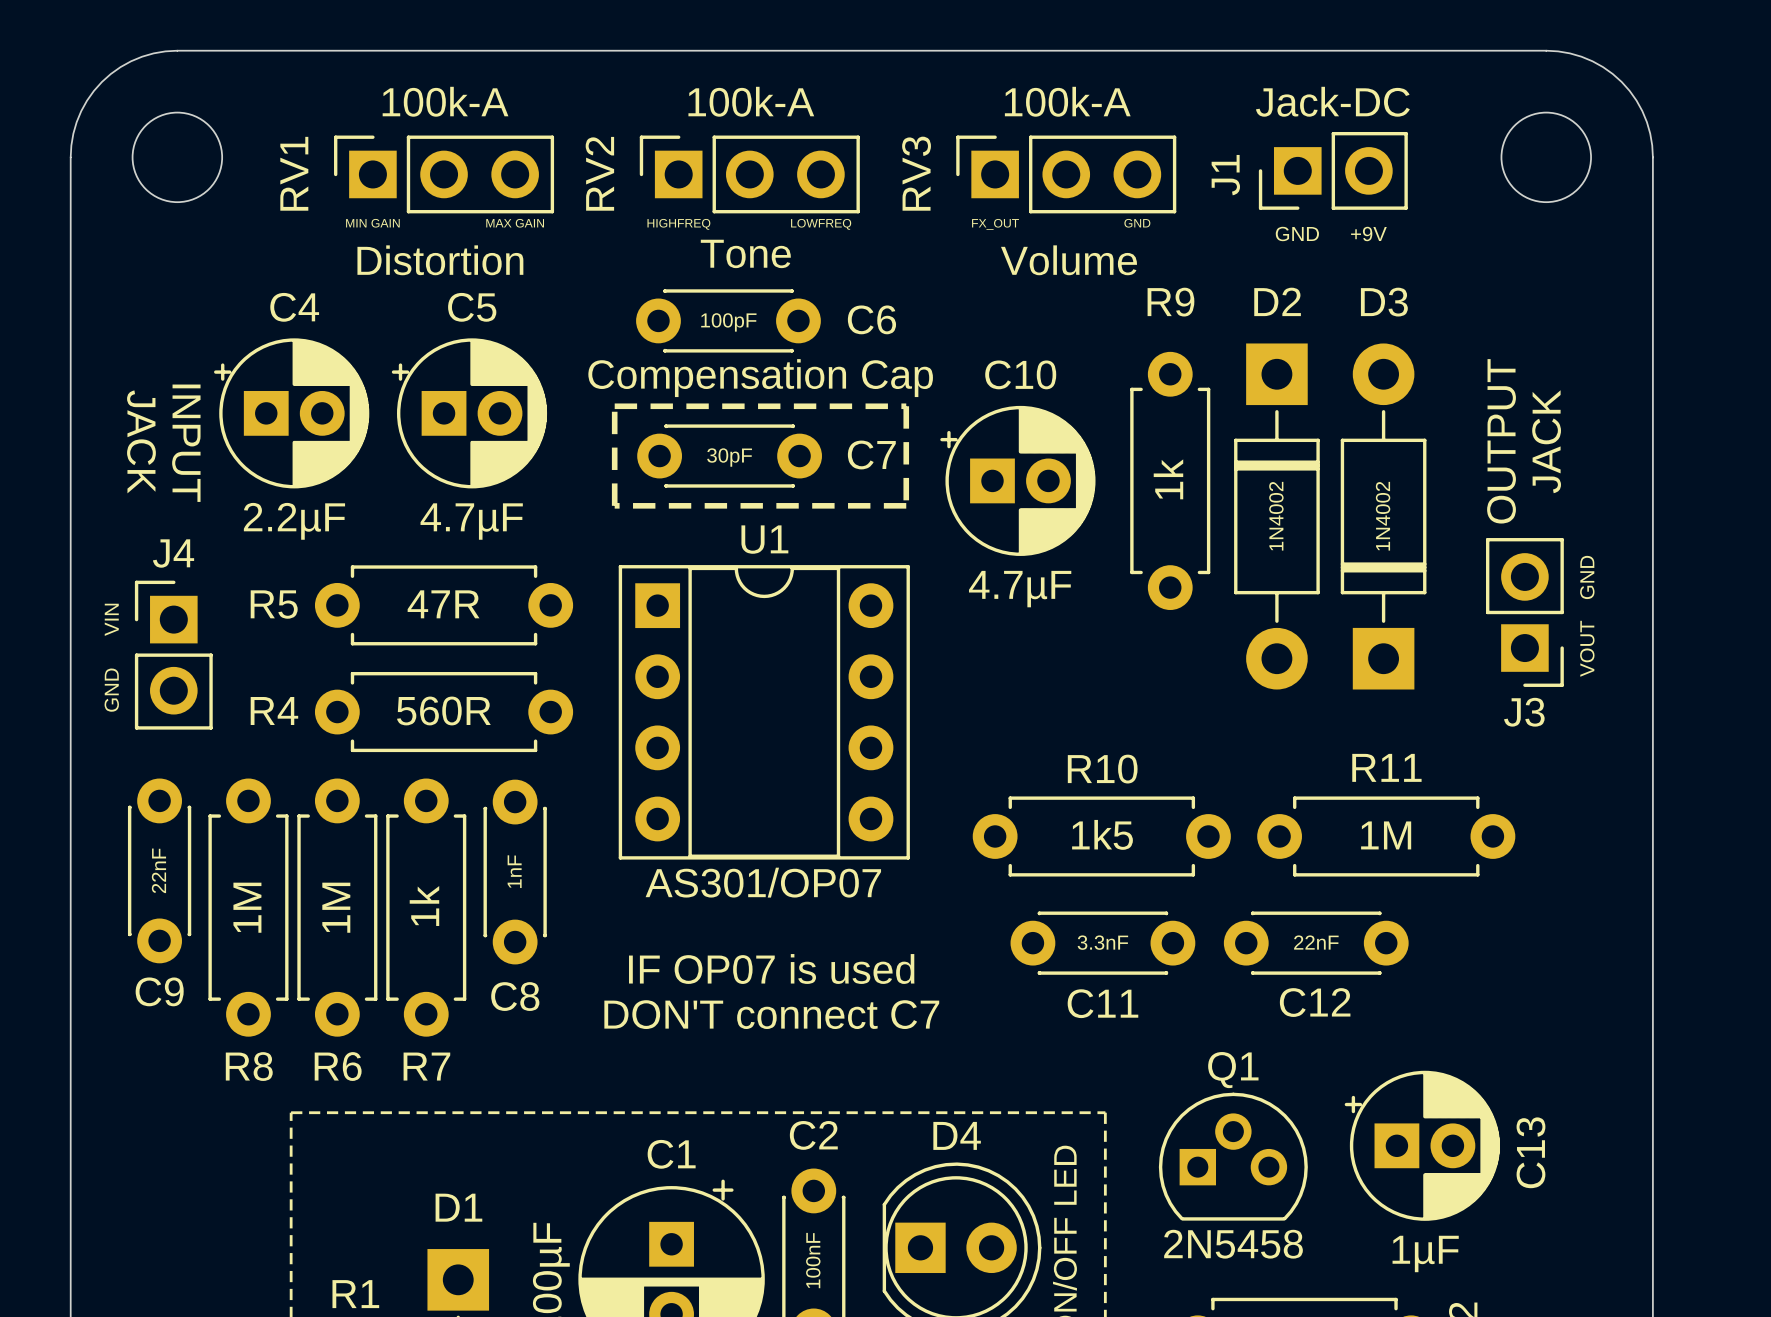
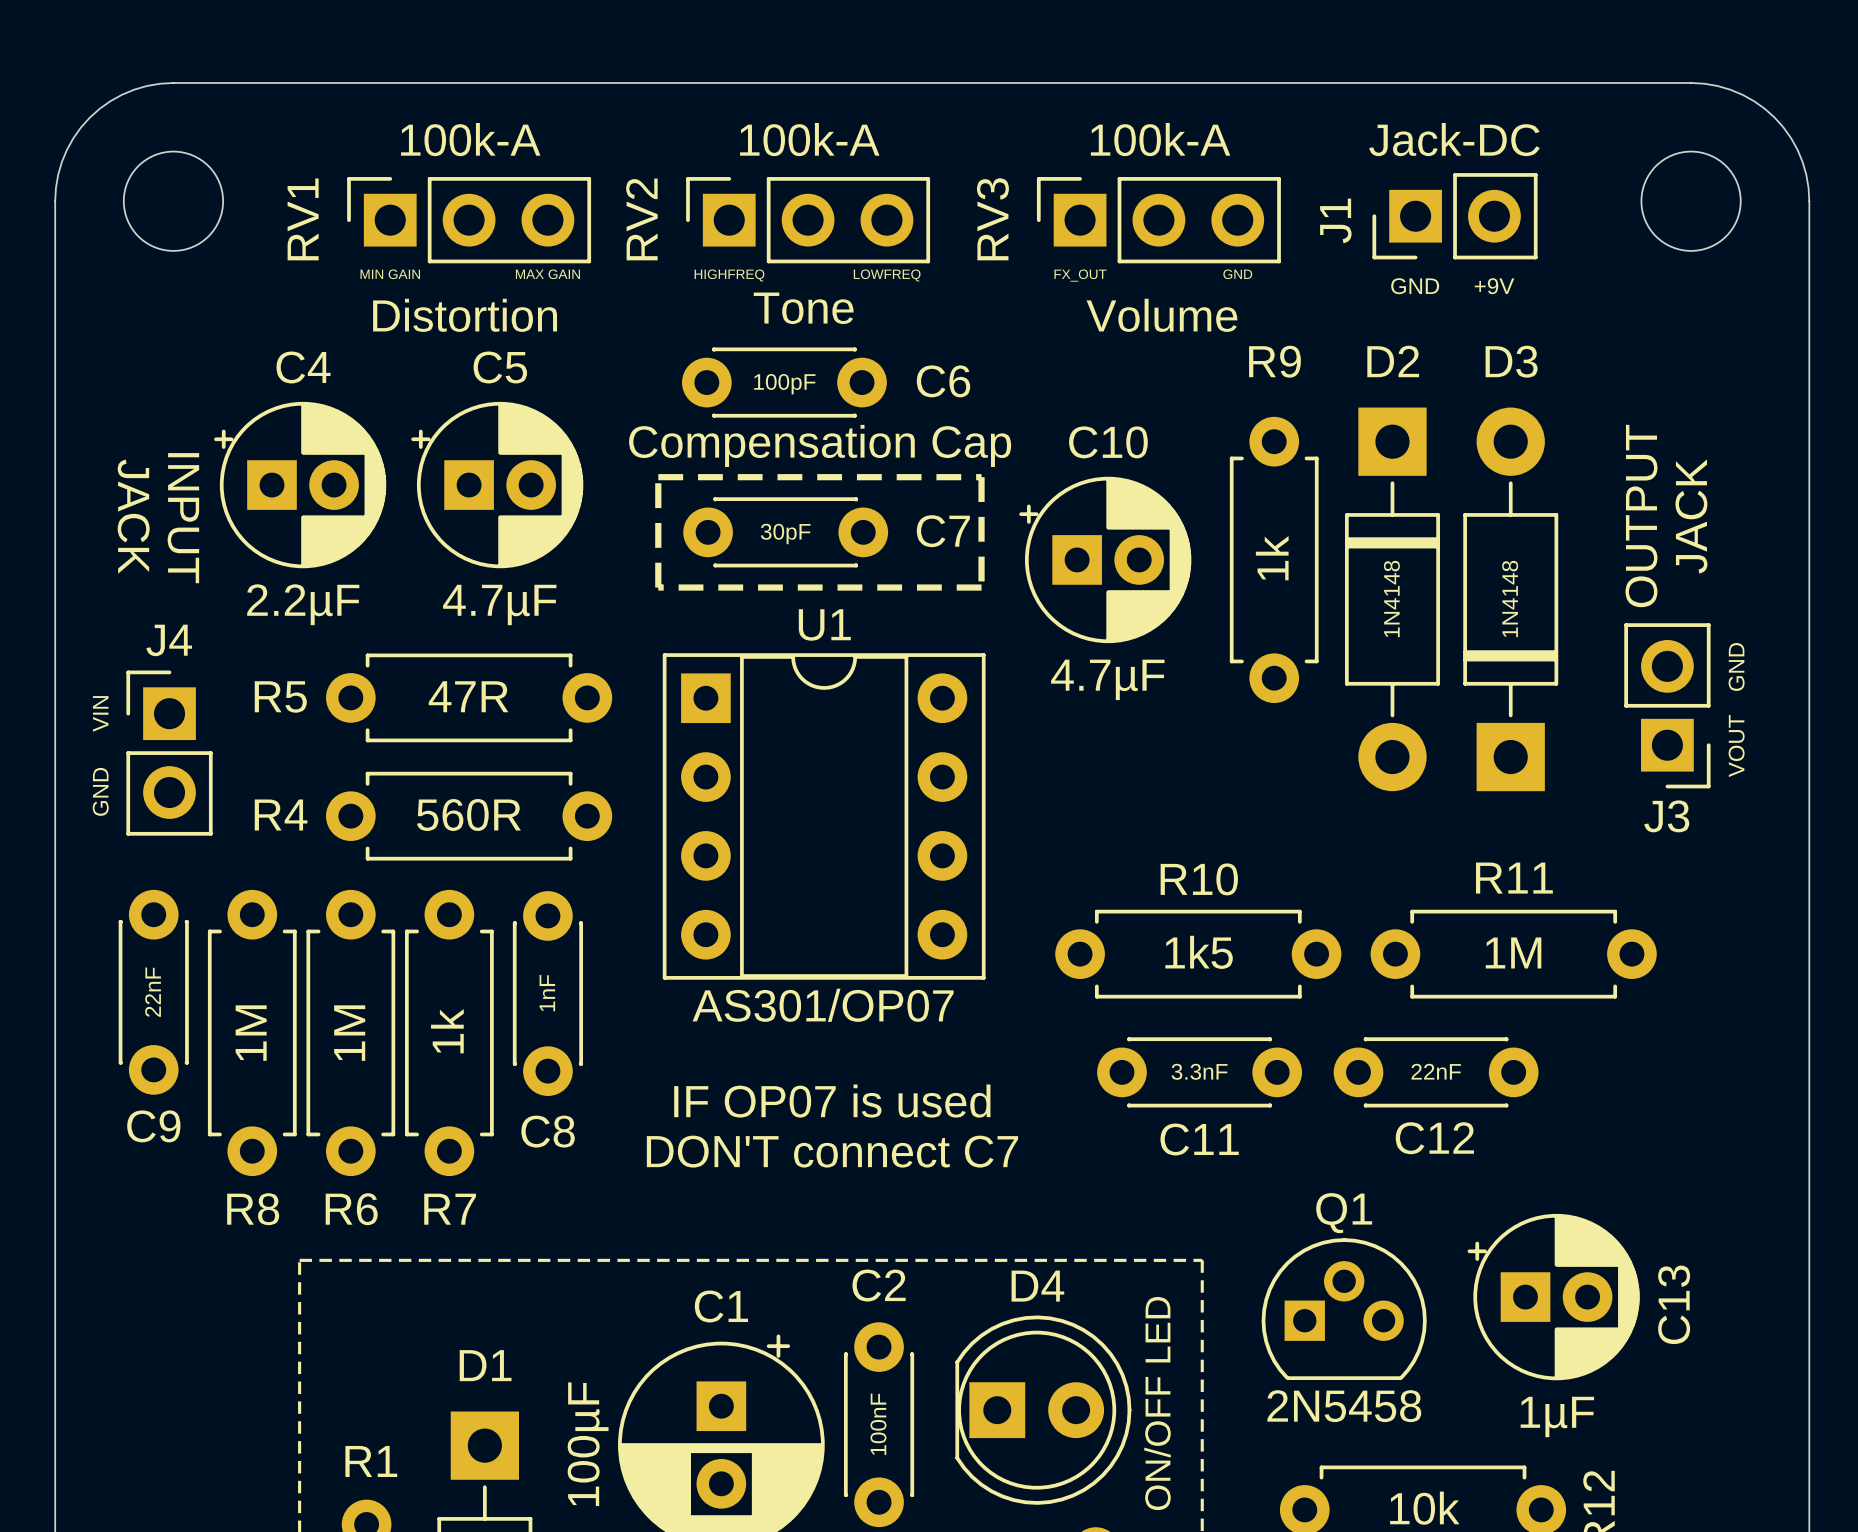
D2 value: 1N4002 (1276, 516) -> 1N4148 (1391, 598)
D3 value: 1N4002 (1383, 516) -> 1N4148 (1510, 598)

